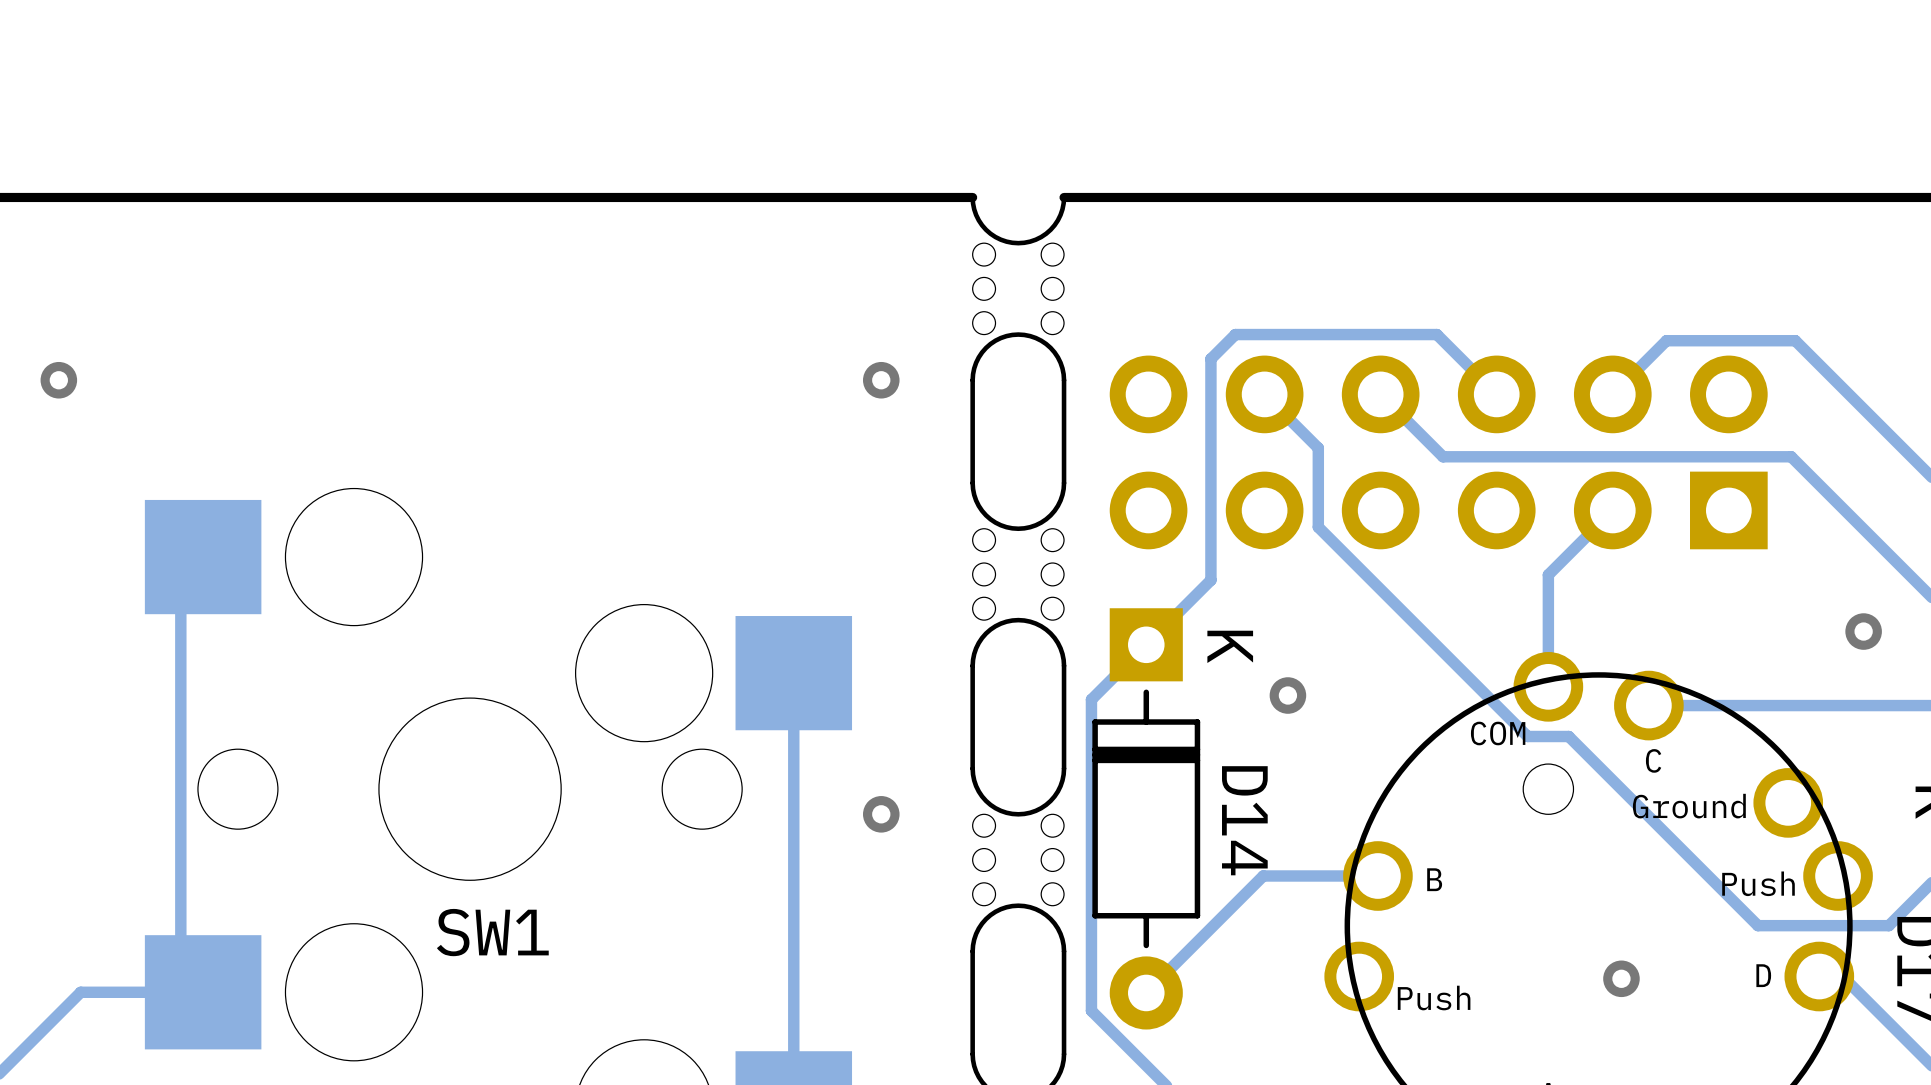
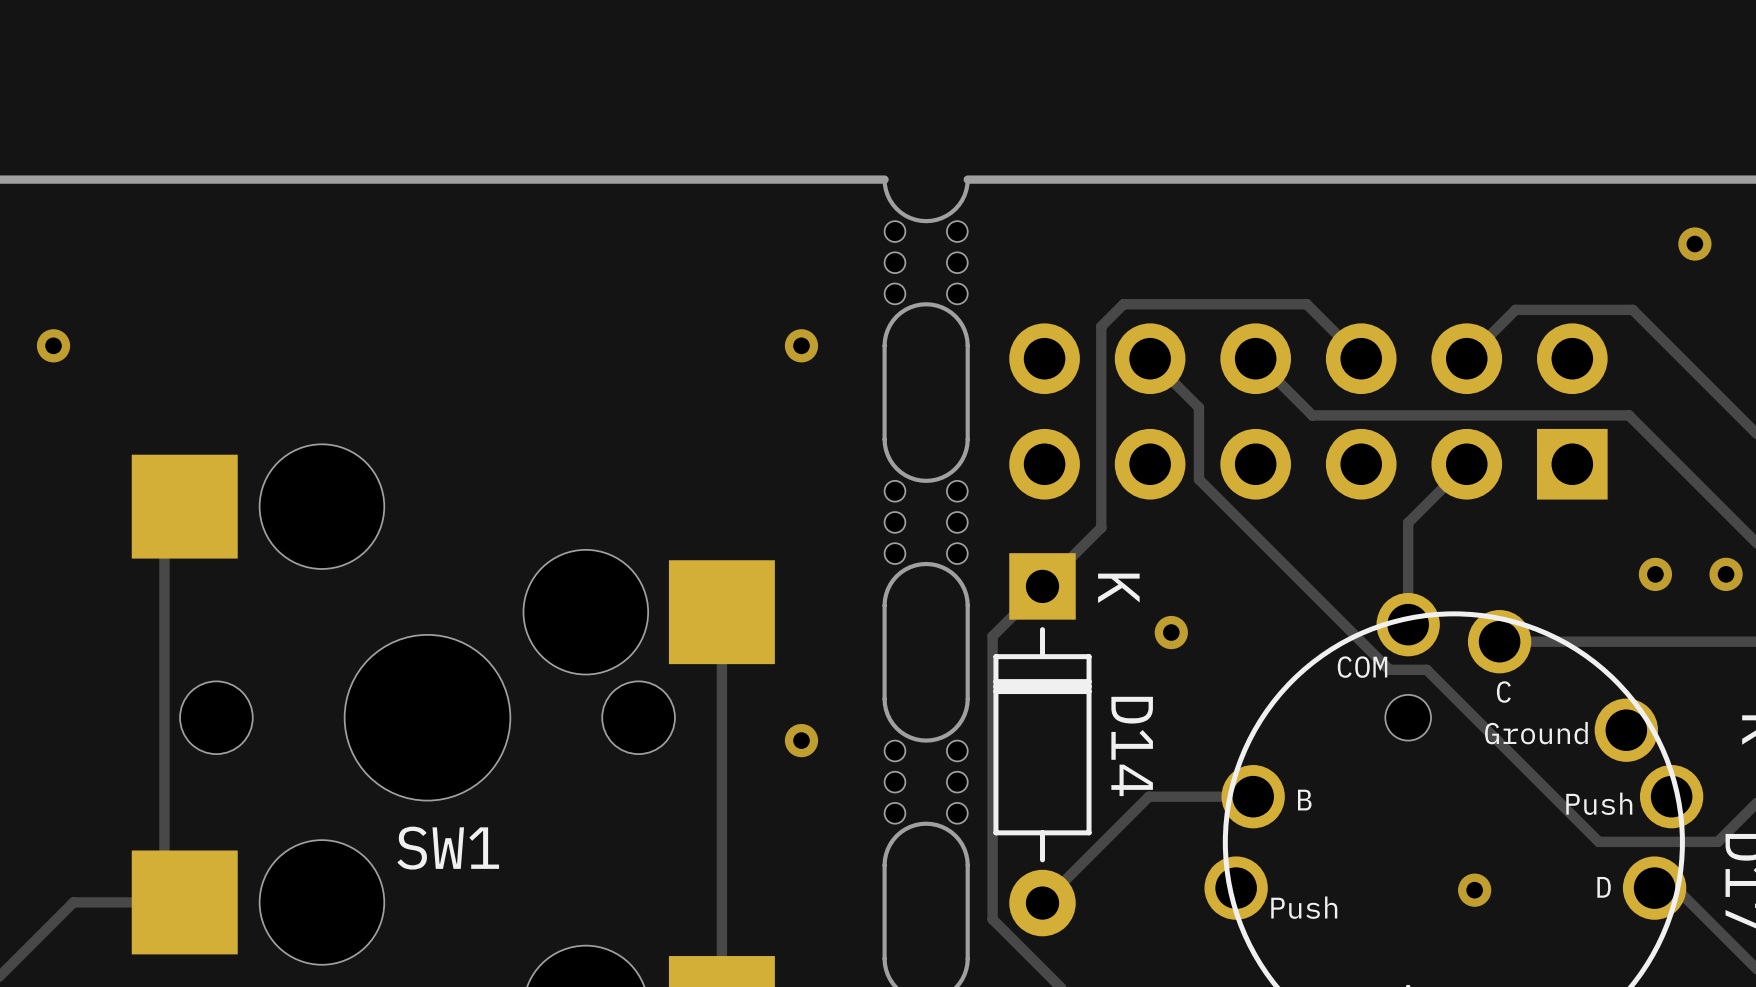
via: none -> (1694, 244)
via: none -> (1655, 574)
via position: (1863, 631) -> (1726, 574)

